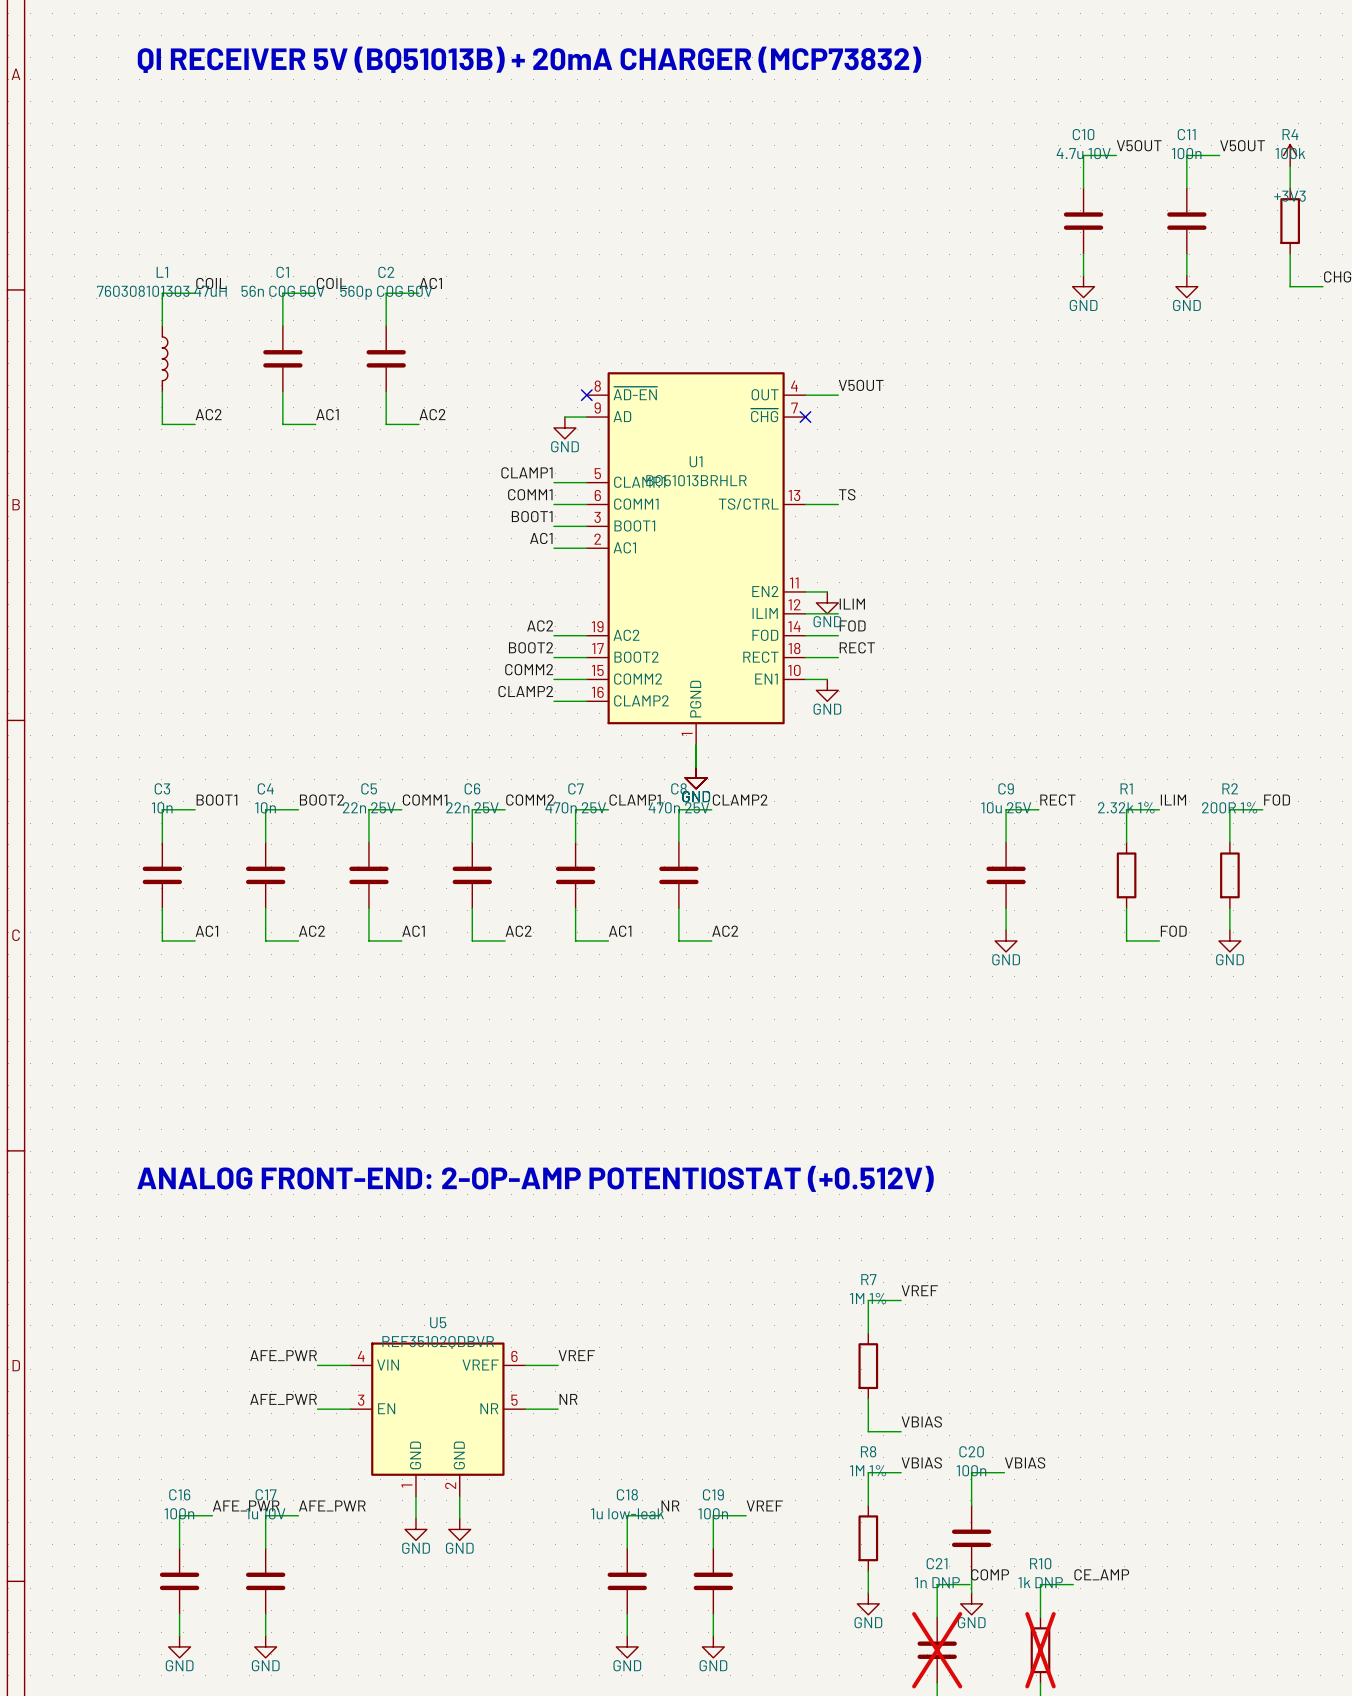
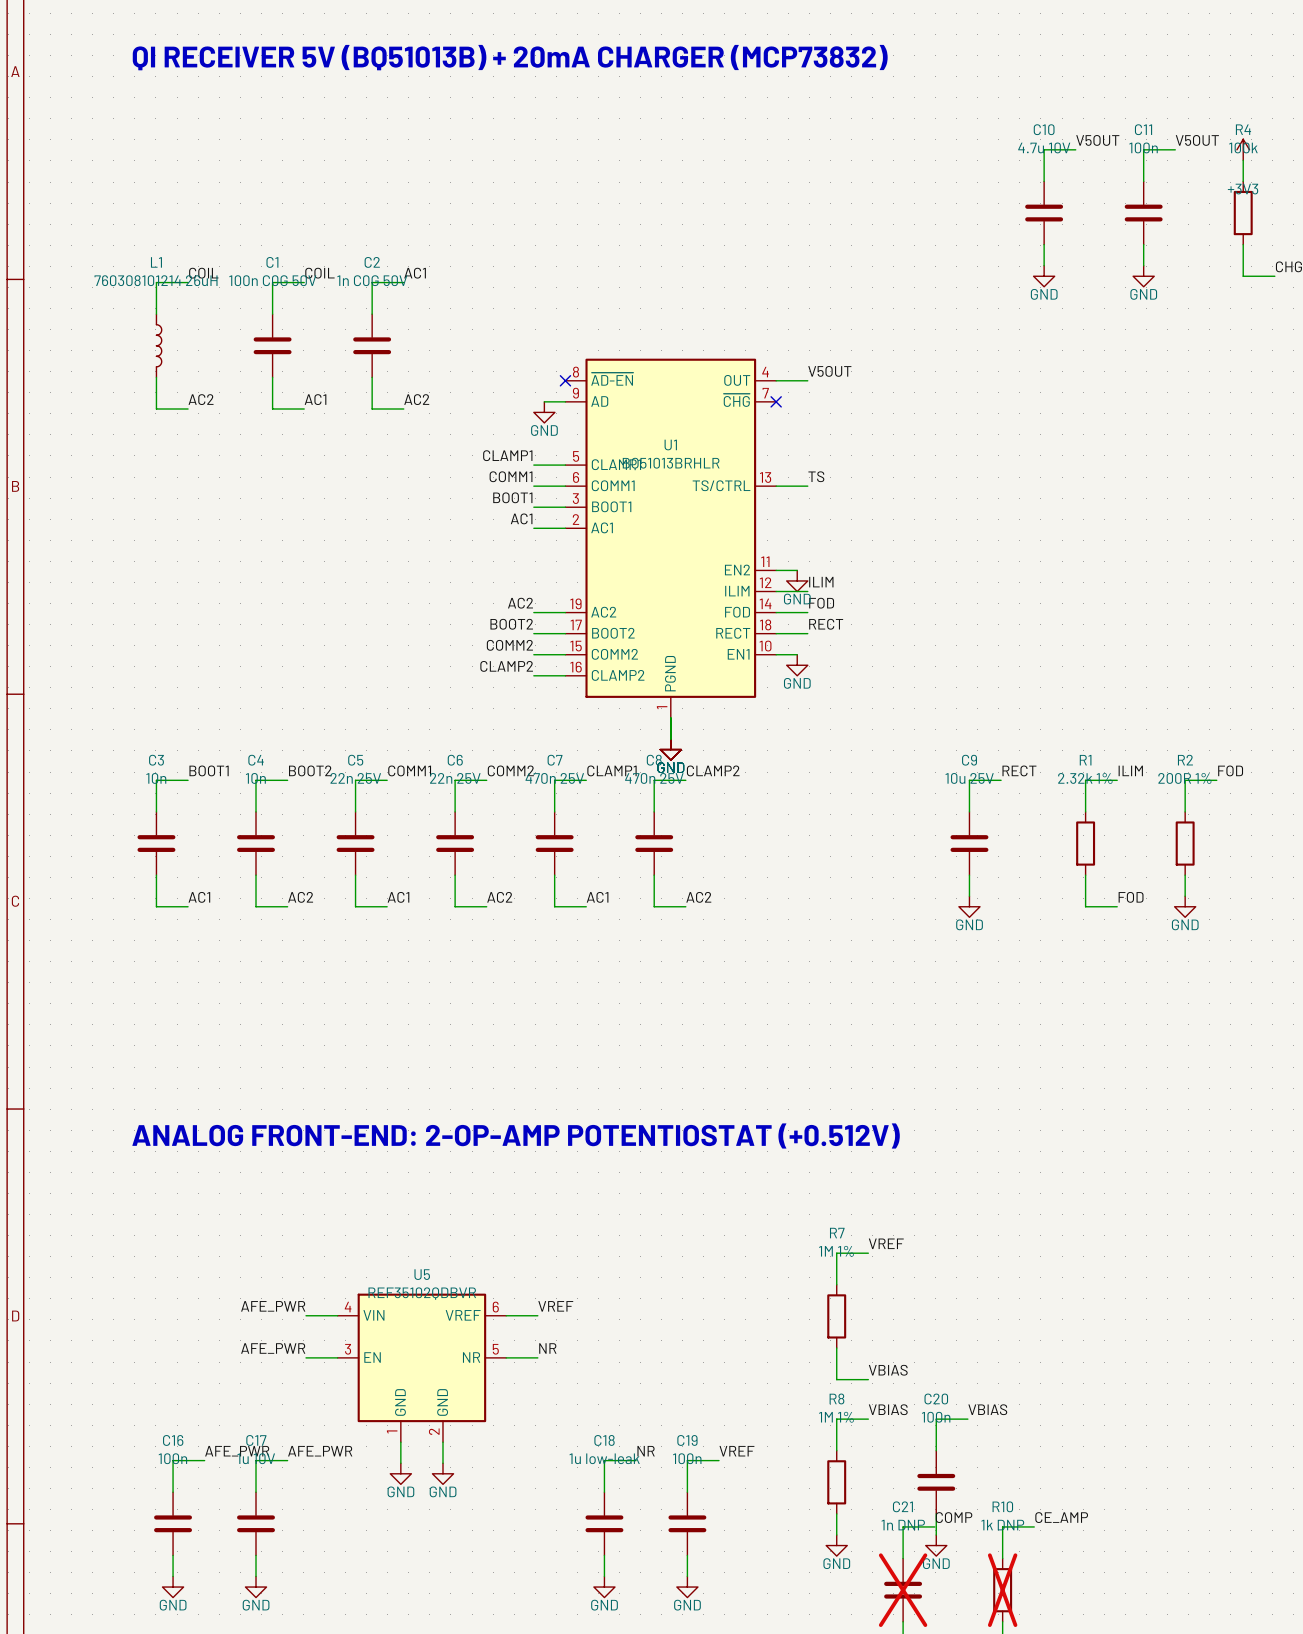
L1 value: 760308101303 47uH (161, 291) -> 760308101214 26uH (156, 280)
C1 value: 56n C0G 50V (283, 291) -> 100n C0G 50V (272, 280)
C2 value: 560p C0G 50V (386, 292) -> 1n C0G 50V (372, 280)

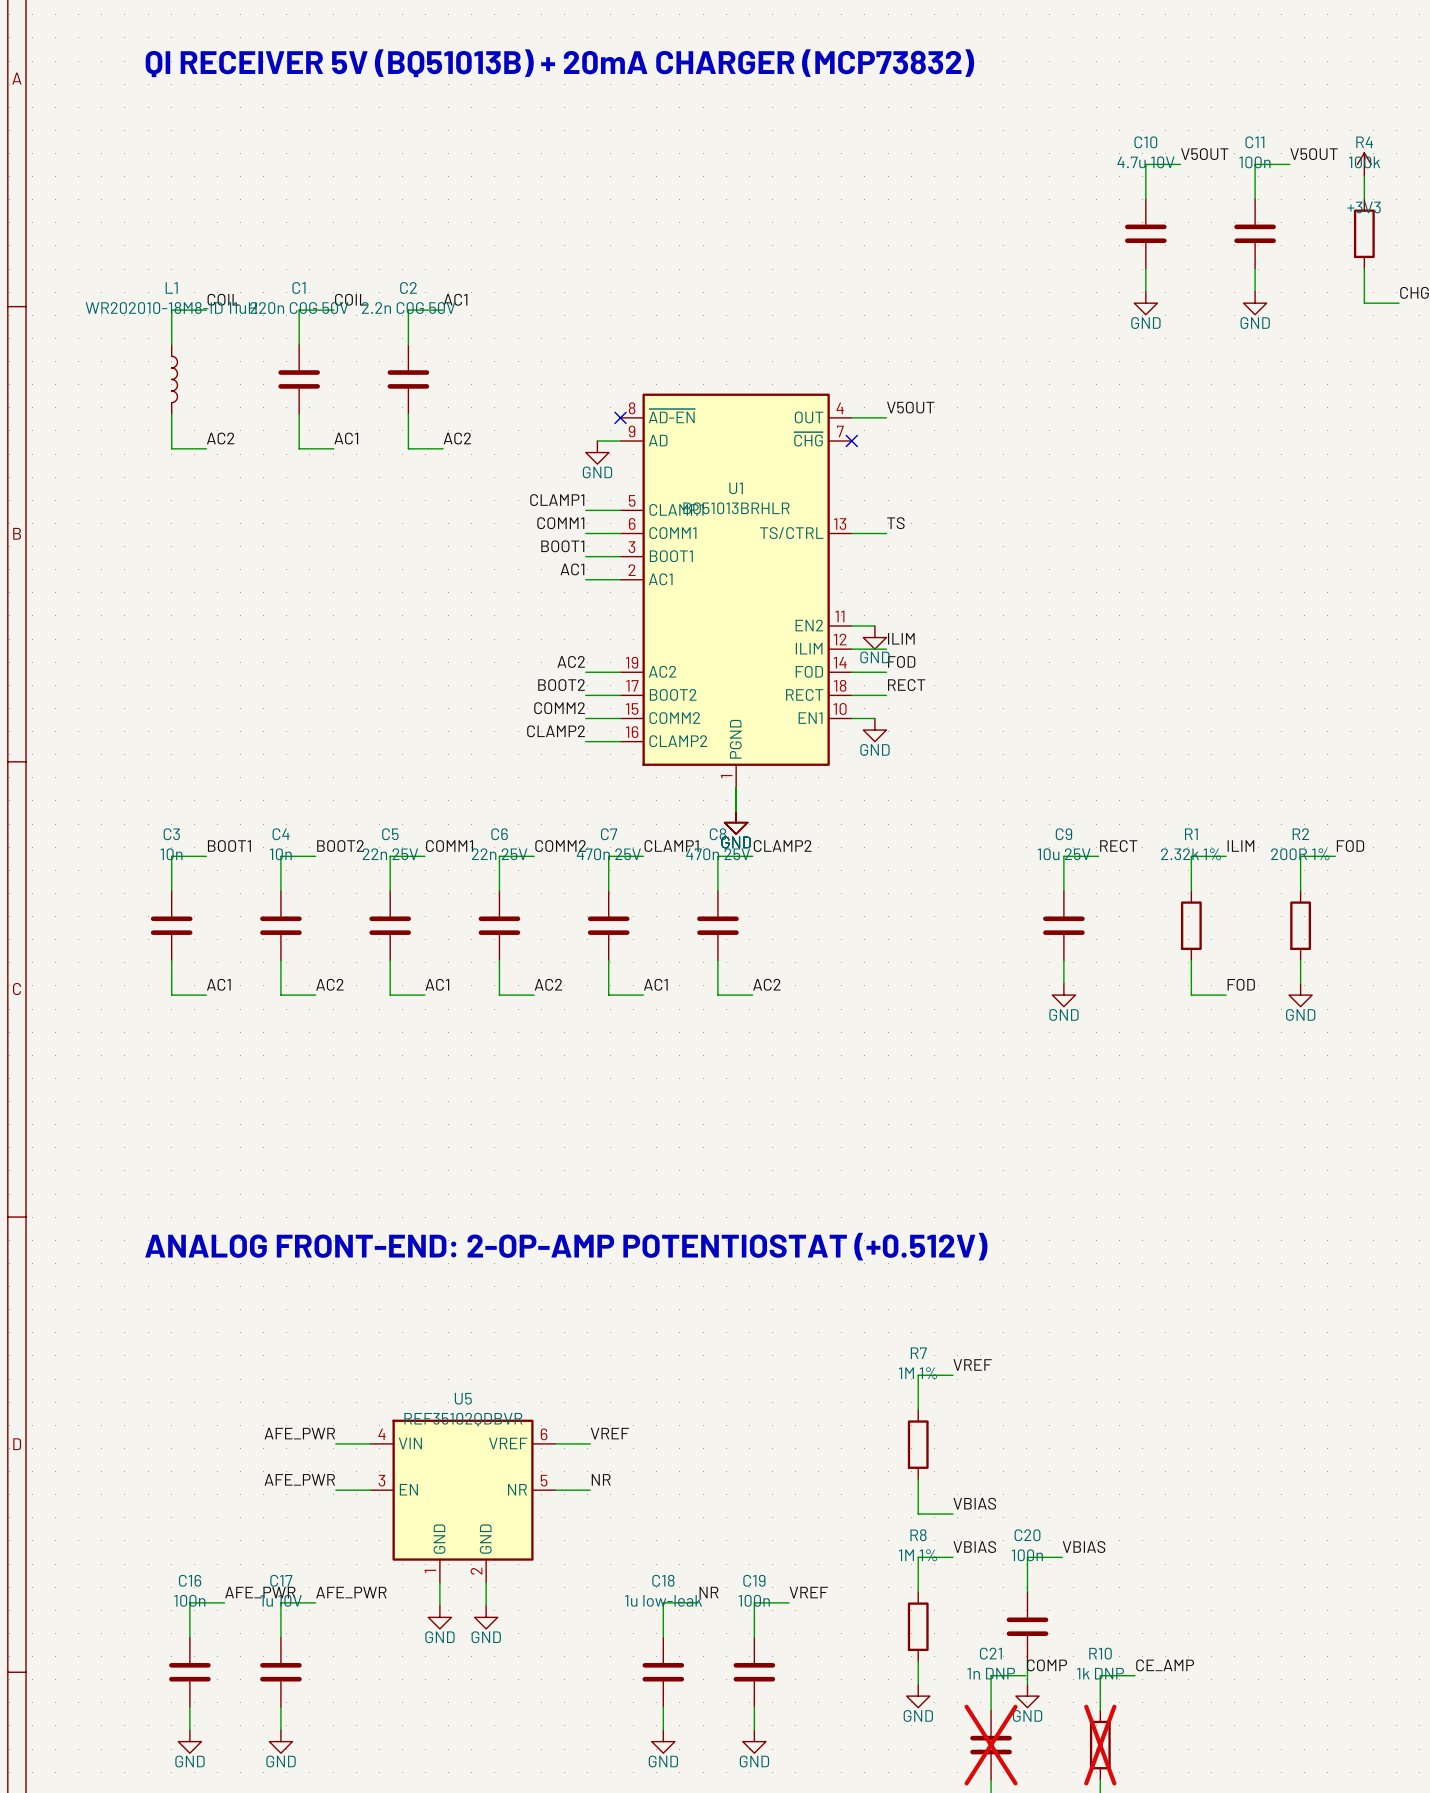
L1 value: 760308101214 26uH (156, 280) -> WR202010-18M8-ID 11uH (171, 308)
C1 value: 100n C0G 50V (272, 280) -> 220n C0G 50V (299, 308)
C2 value: 1n C0G 50V (372, 280) -> 2.2n C0G 50V (408, 308)

